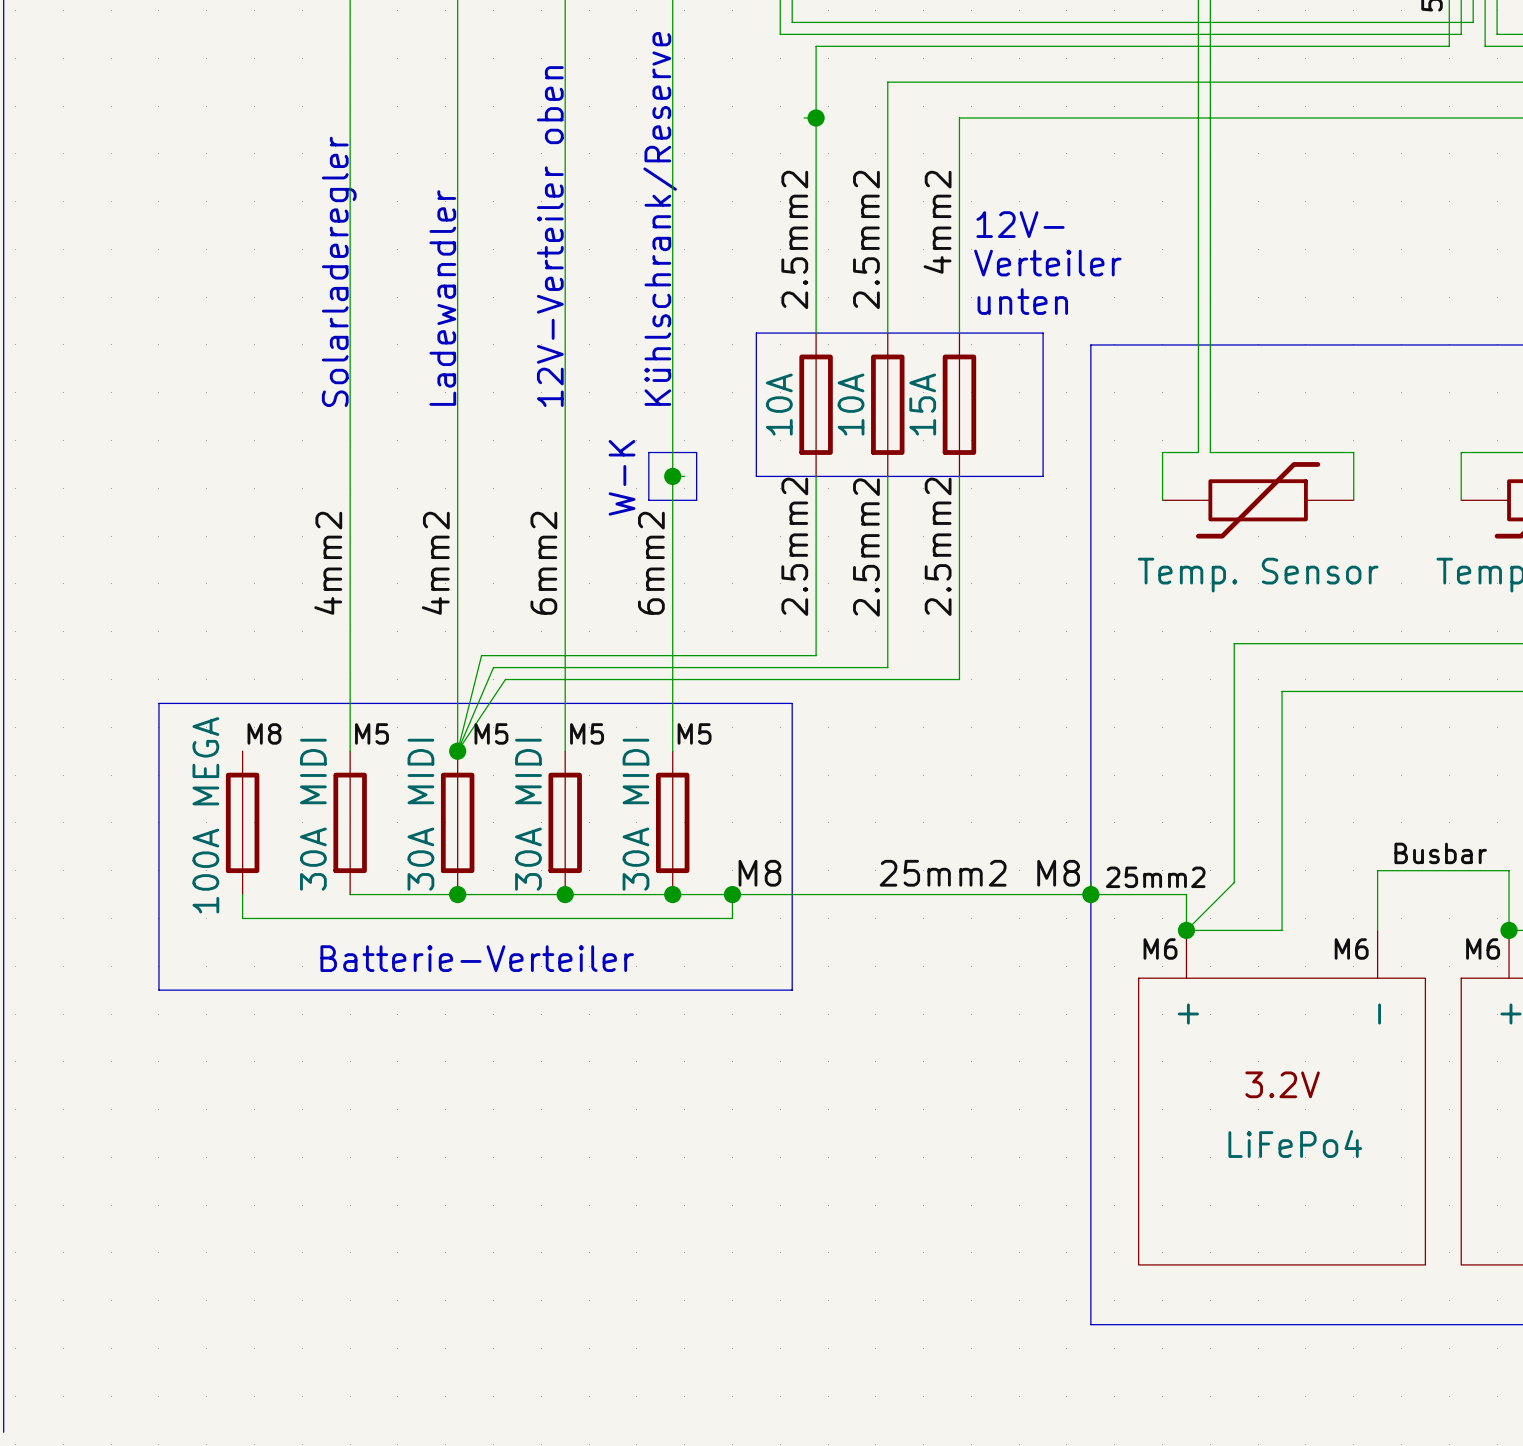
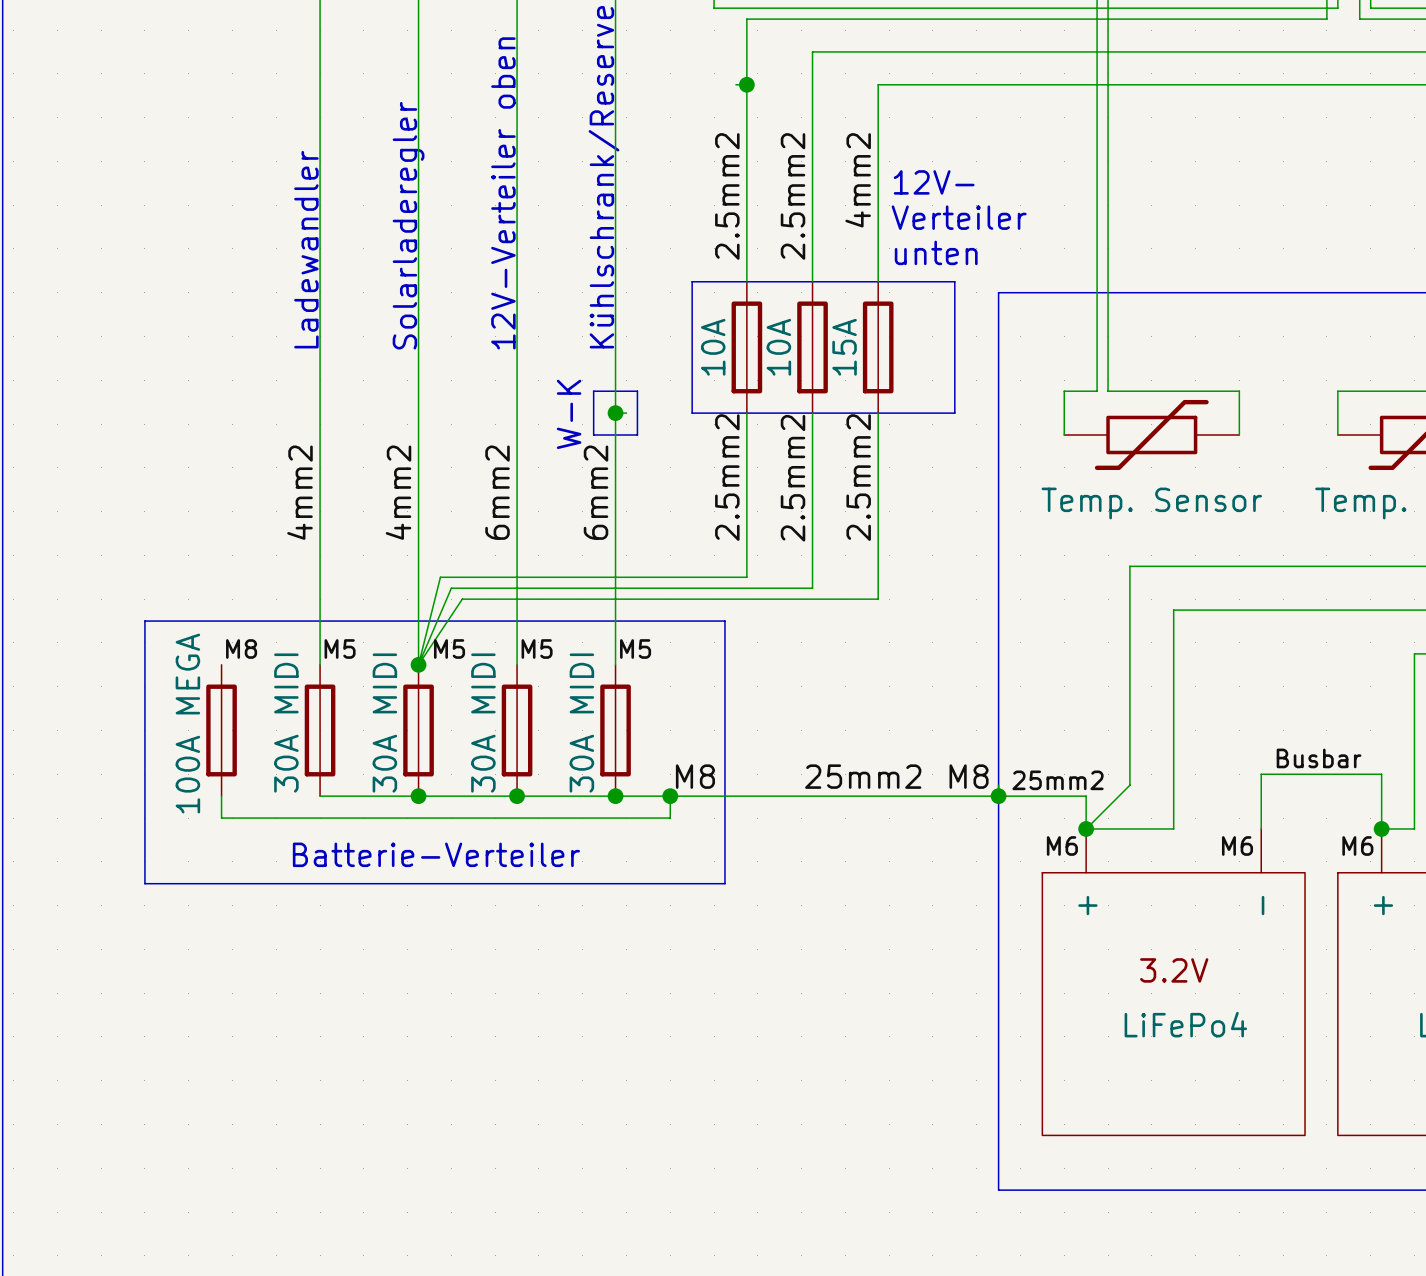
text: Solarladeregler (339, 271) -> Ladewandler (306, 249)
text: Ladewandler (442, 298) -> Solarladeregler (408, 225)

